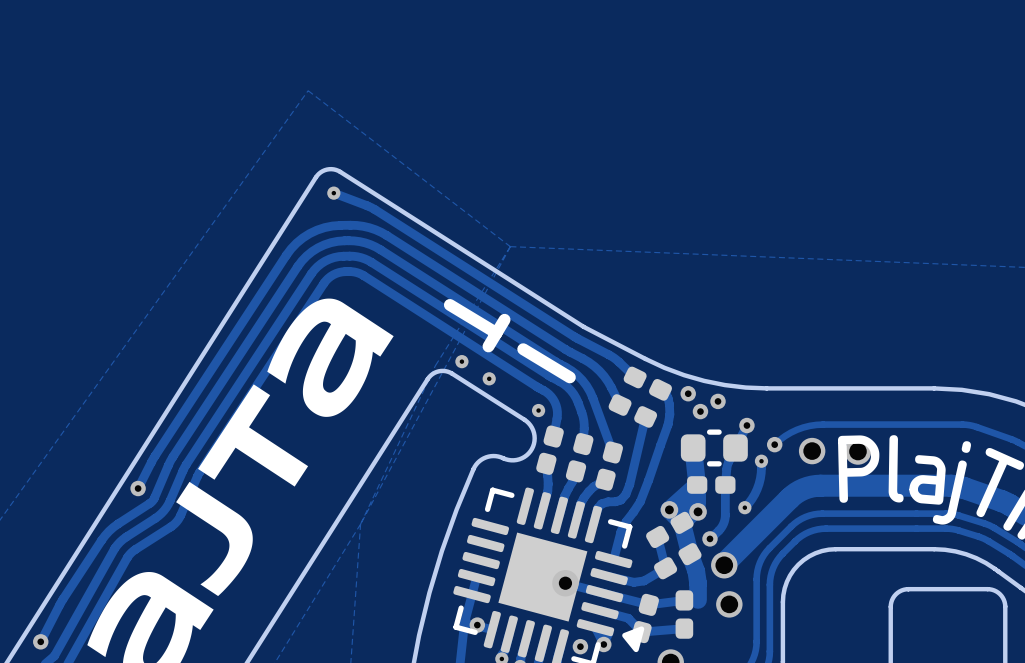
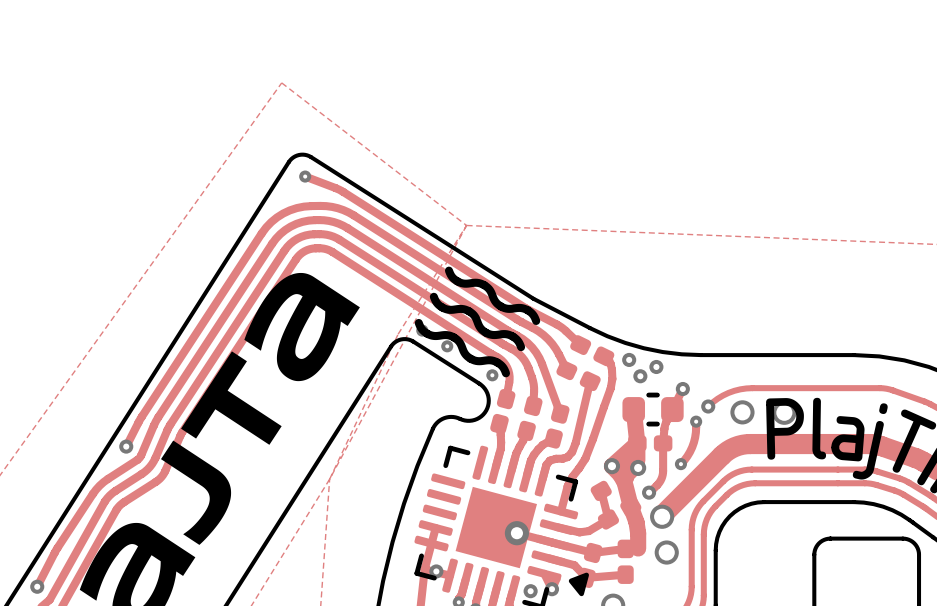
line: none -> (448, 270) (452, 277) (459, 282) (478, 283) (486, 286) (496, 302) (502, 307) (520, 307) (527, 310) (536, 320)
line: (449, 304) (496, 333) -> none
line: (504, 319) (488, 346) -> none
line: none -> (433, 296) (437, 303) (444, 308) (463, 309) (471, 312) (481, 328) (487, 333) (505, 334) (512, 336) (521, 347)
line: (523, 349) (569, 377) -> none
line: none -> (418, 322) (427, 333) (434, 335) (452, 336) (458, 341) (468, 357) (476, 360) (495, 361) (502, 366) (505, 373)

